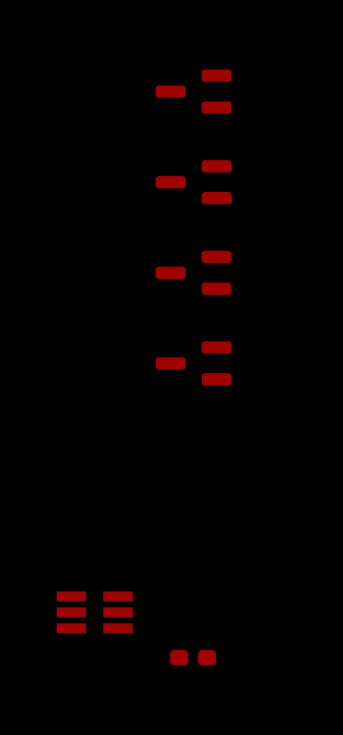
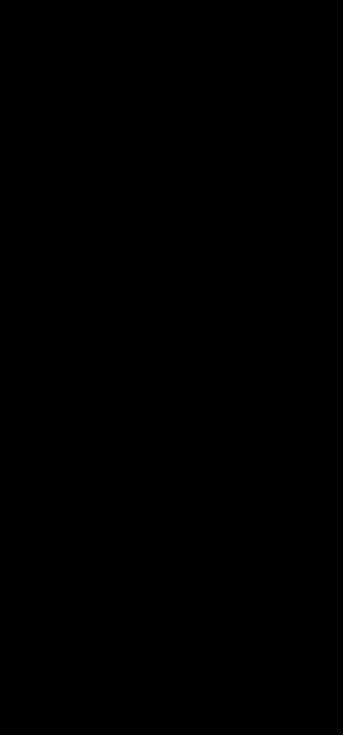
part: (193, 91) -> none
part: (193, 182) -> none
part: (193, 272) -> none
part: (193, 363) -> none
part: (94, 612) -> none
part: (193, 657) -> none

